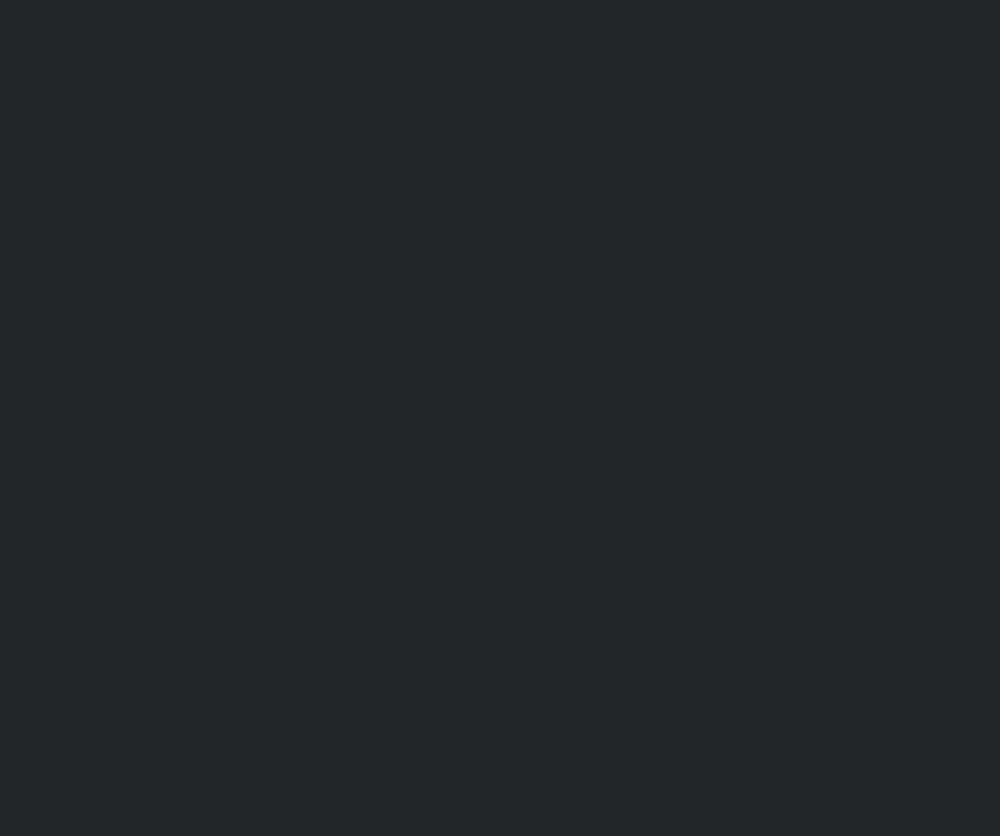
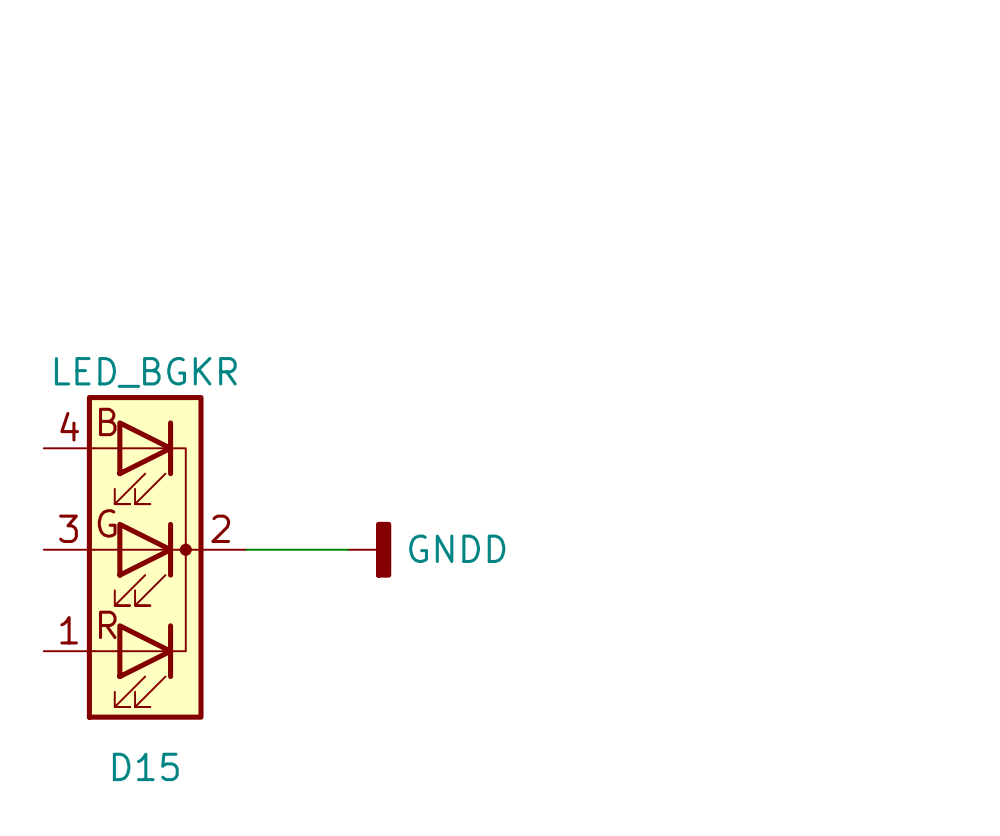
wire: none -> (246, 549) (348, 549)
power symbol: none -> GNDD (369, 549)
D15: none -> LED_BGKR (145, 557)

